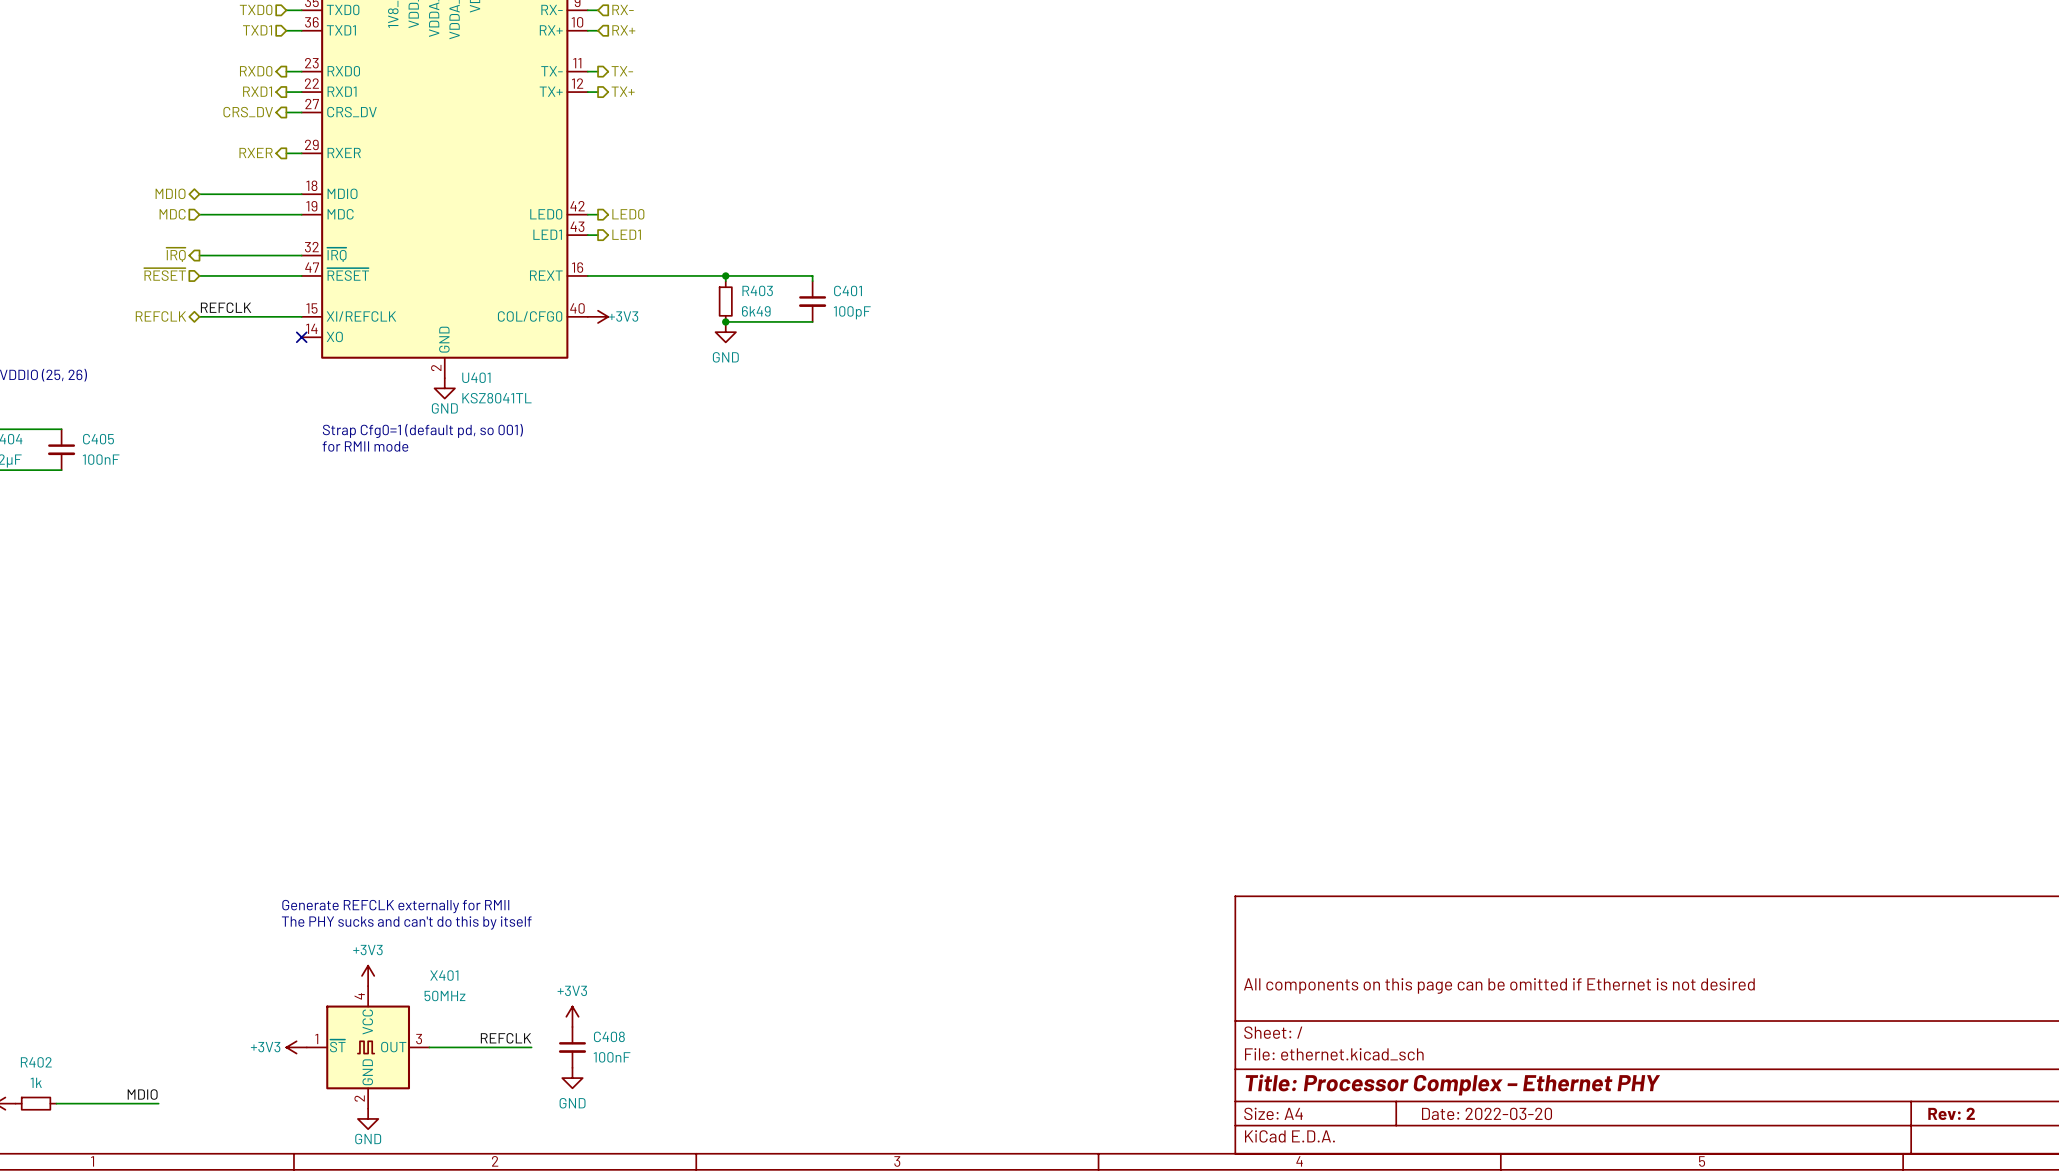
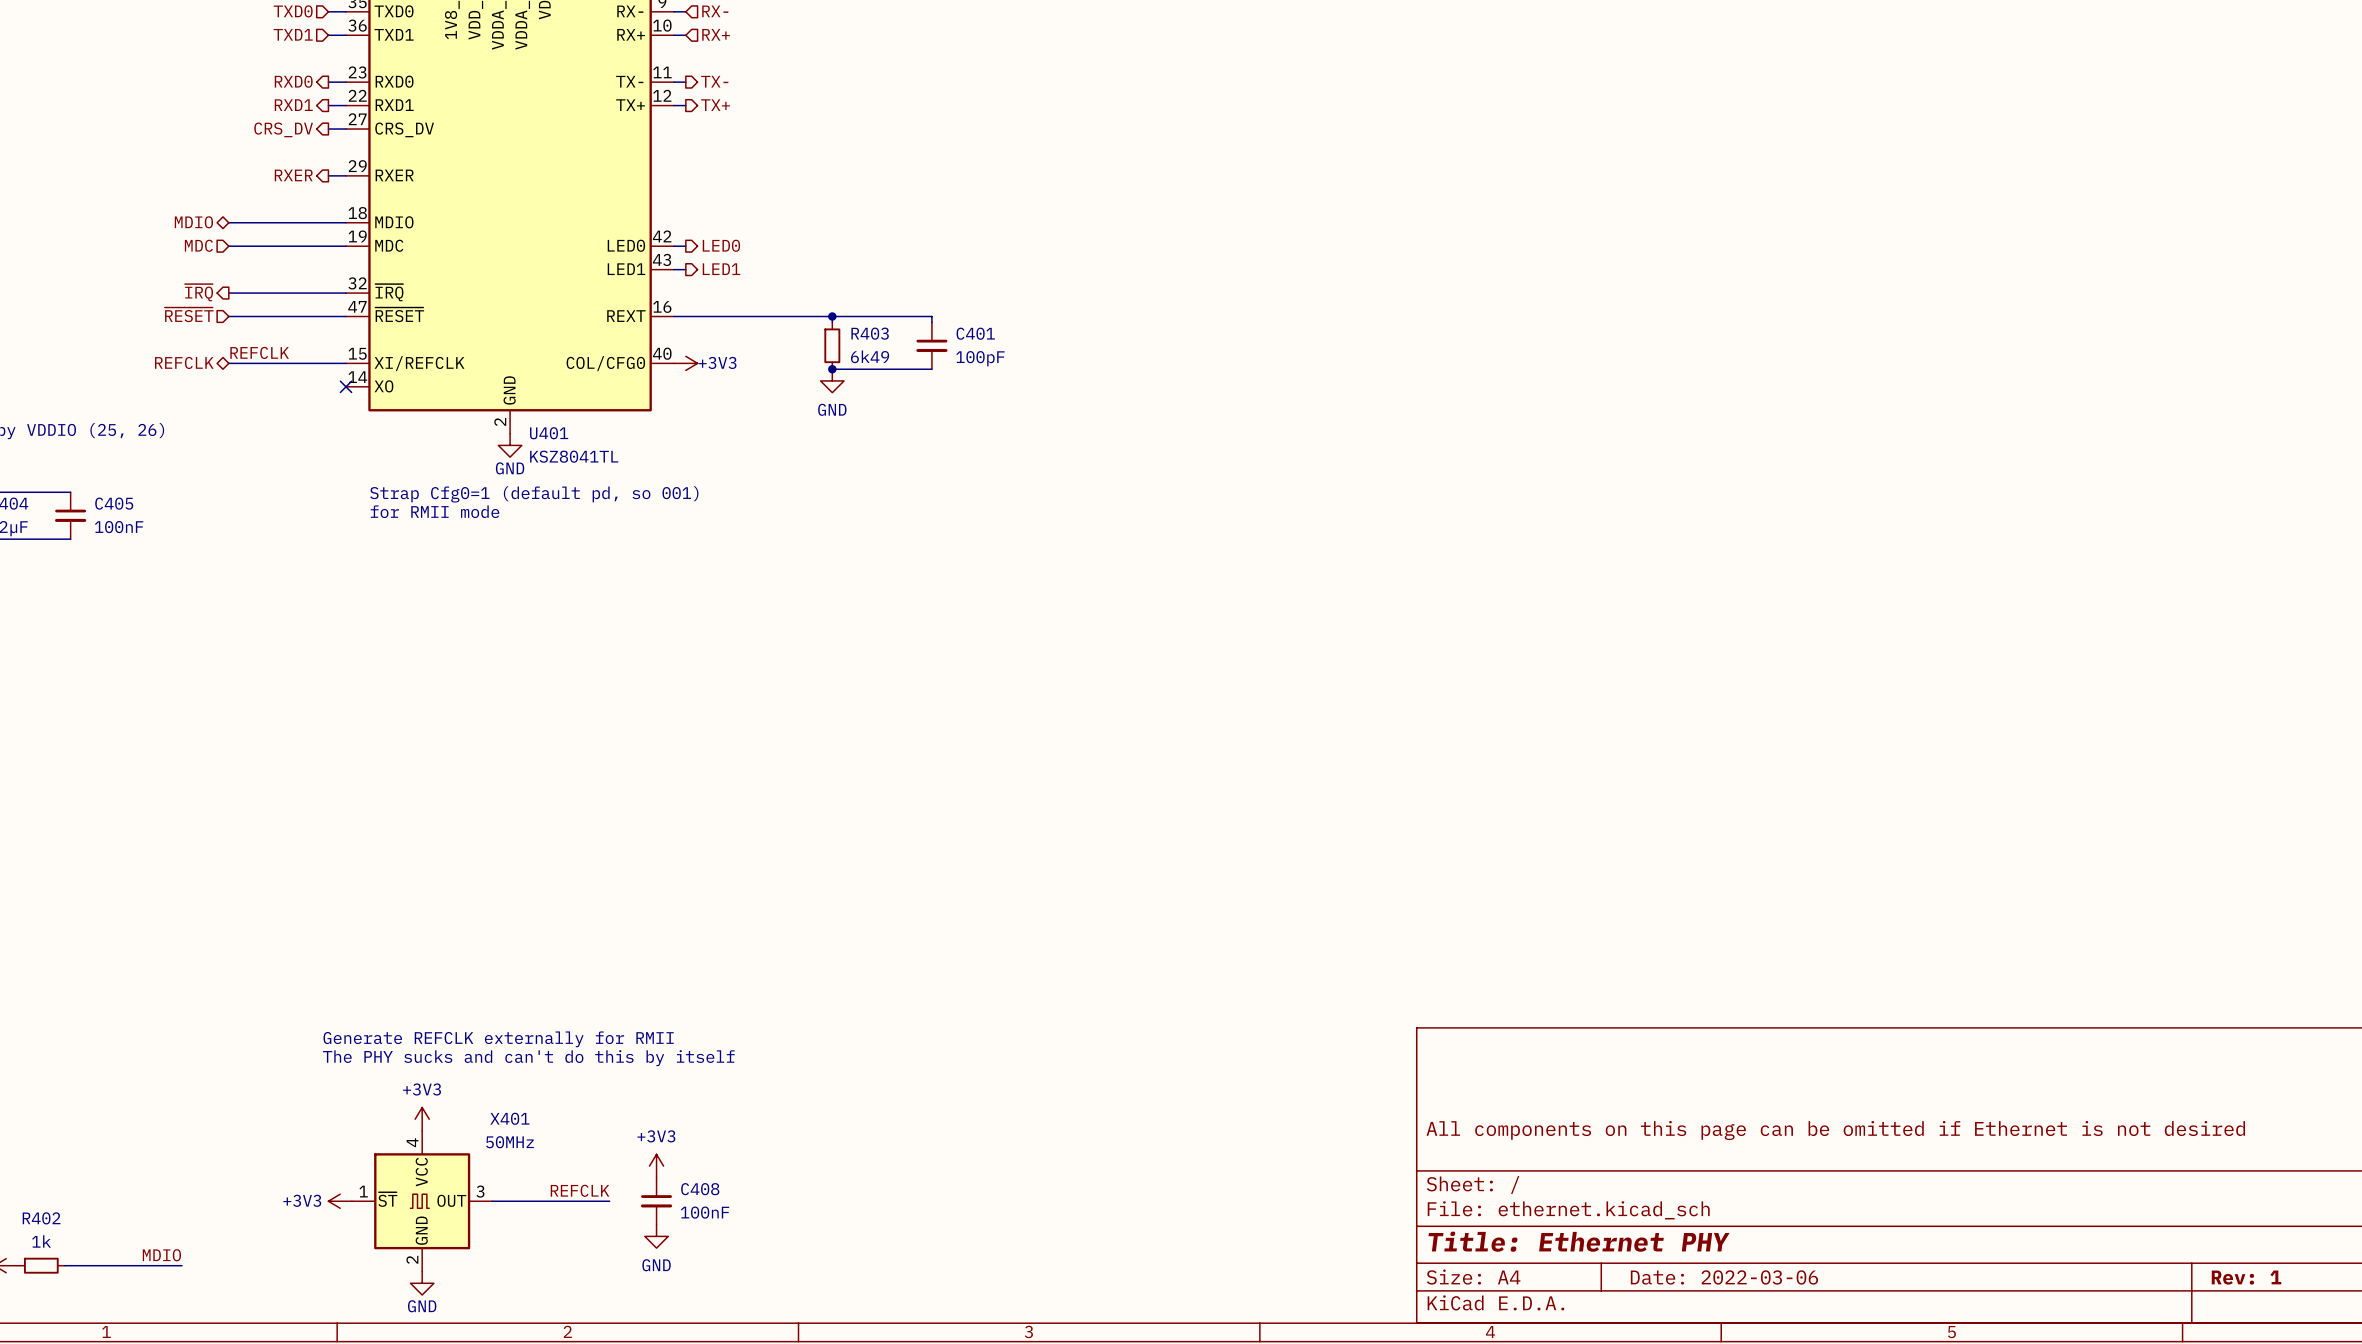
title block: Title: Processor Complex – Ethernet PHY (1452, 1084) -> Title: Ethernet PHY (1579, 1241)
title block: Date: 2022-03-20 (1487, 1113) -> Date: 2022-03-06 (1724, 1277)
title block: Rev: 2 (1951, 1113) -> Rev: 1 (2246, 1277)

